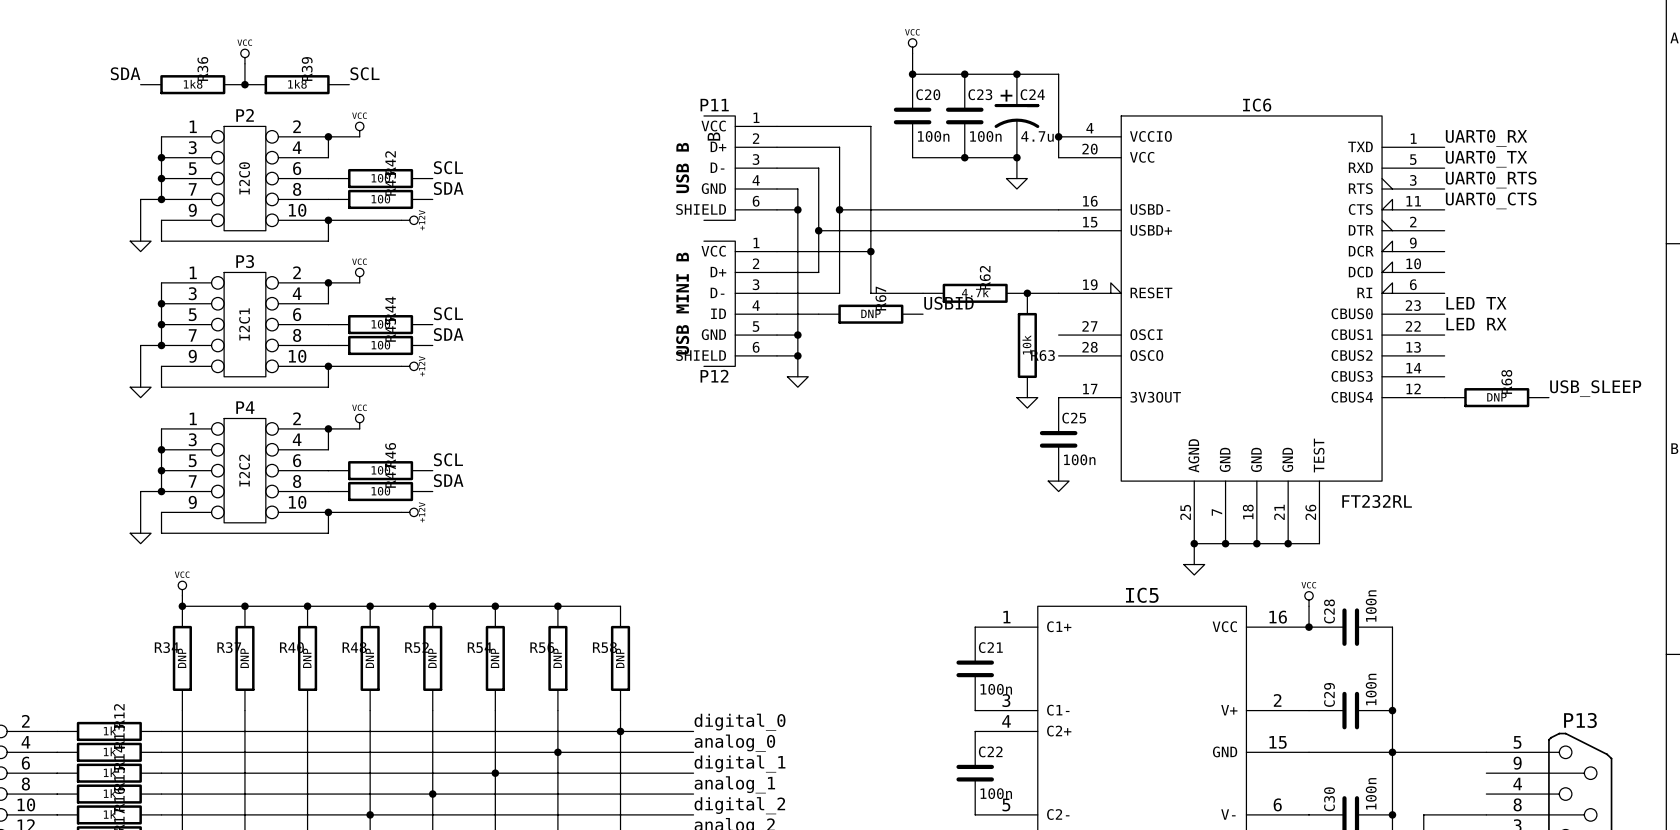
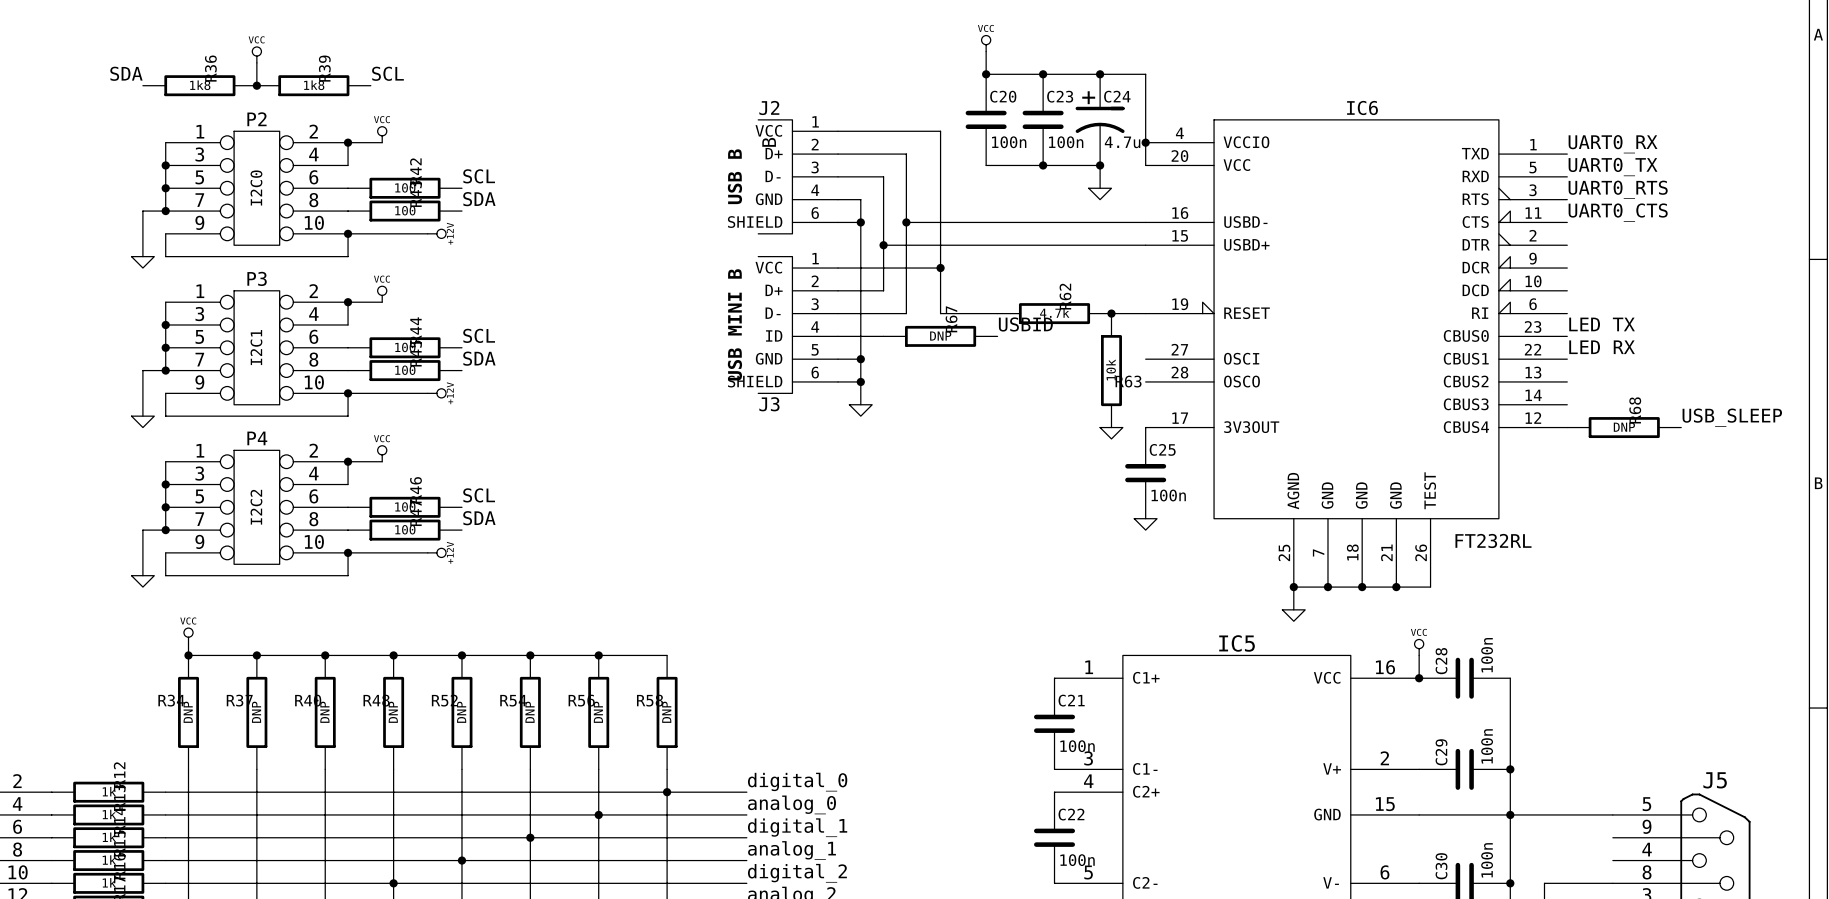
P11 name: P11 (714, 105) -> J2 (769, 107)
P12 name: P12 (714, 376) -> J3 (769, 404)
P13 name: P13 (1580, 720) -> J5 (1715, 780)

